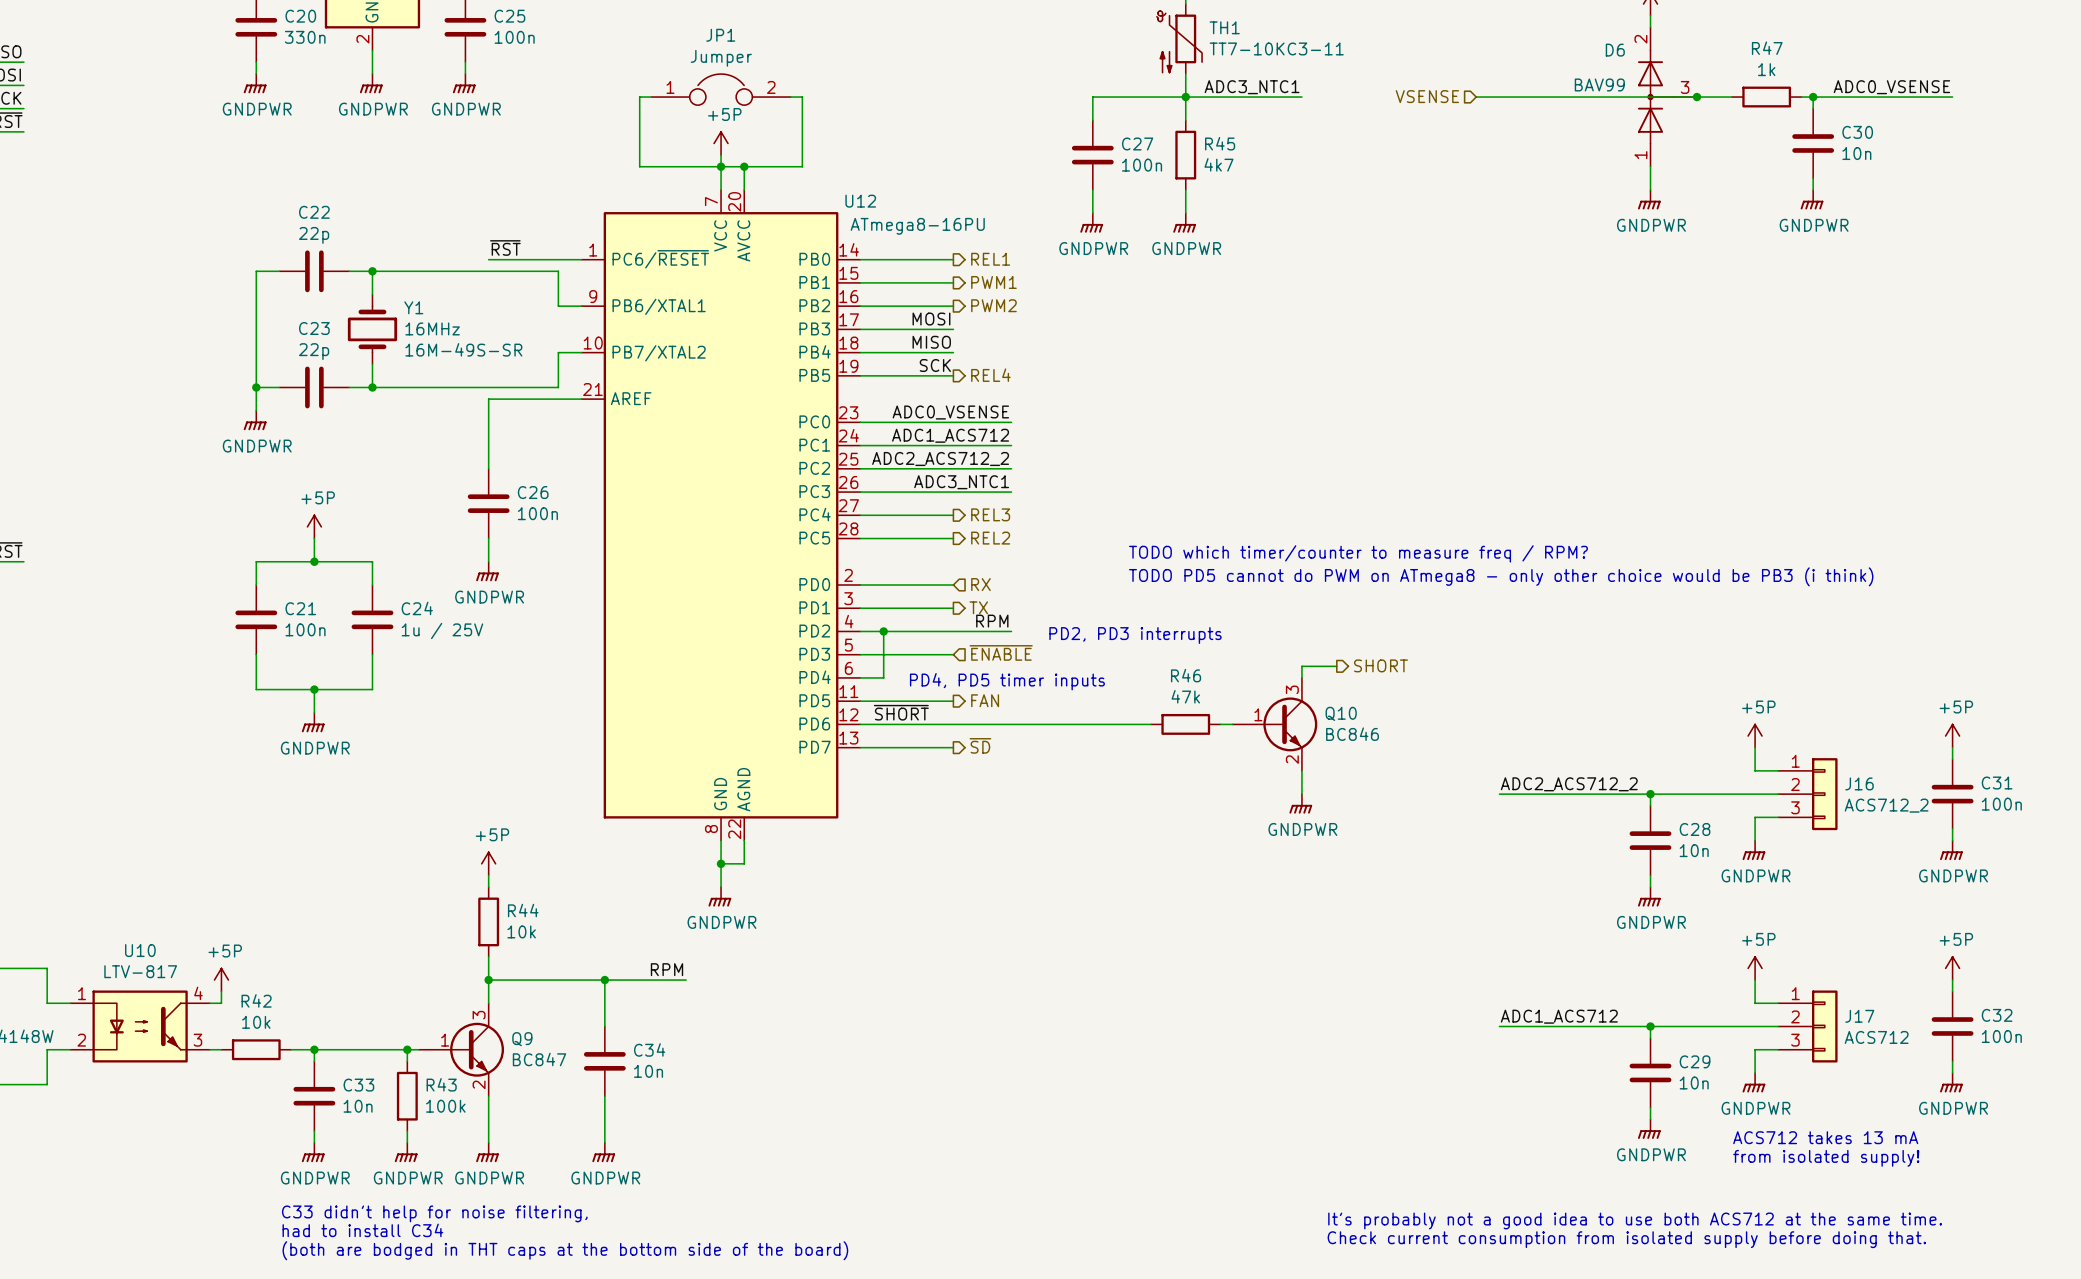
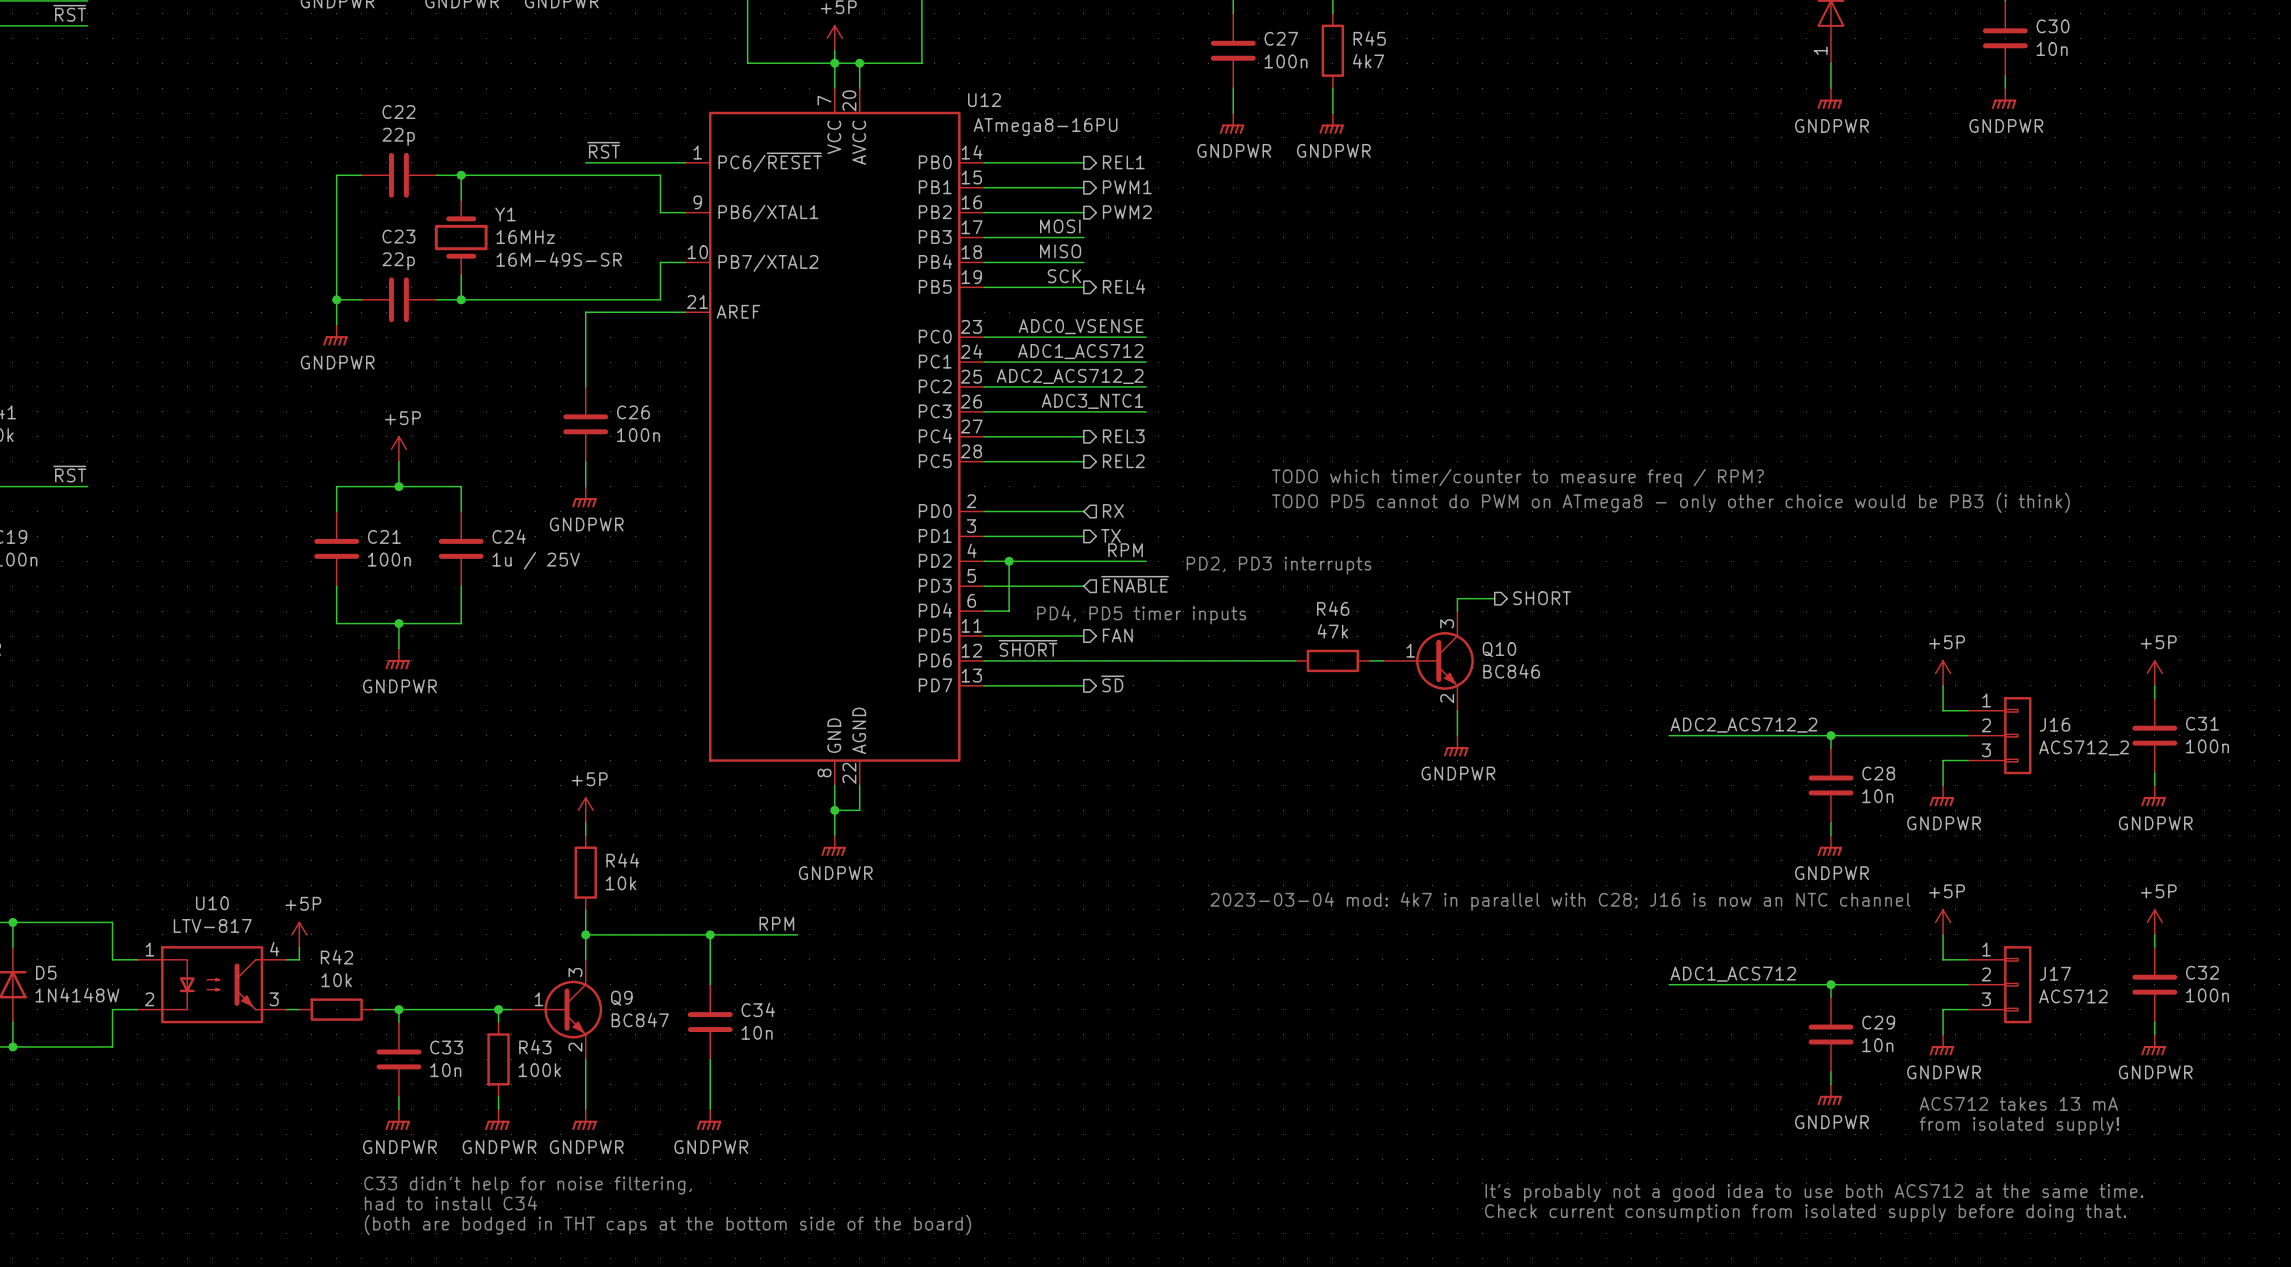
text: none -> 2023-03-04 mod: 4k7 in parallel with C28; J16 is now an NTC channel (1560, 901)

